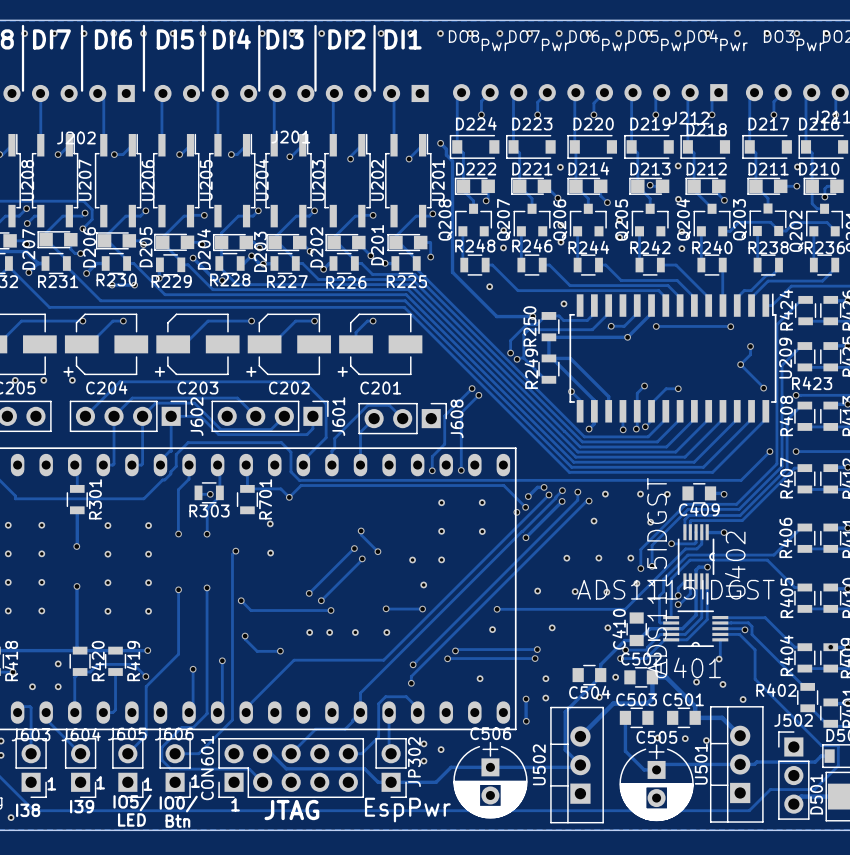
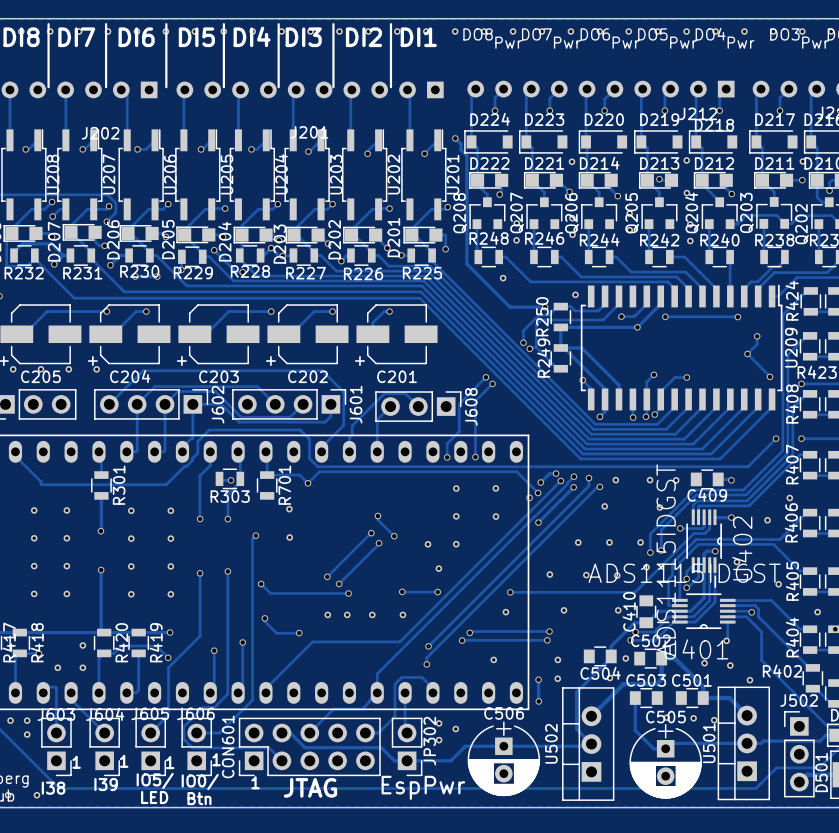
part: none -> (789, 498)
part: none -> (767, 520)
part: none -> (736, 562)
part: none -> (778, 584)
part: none -> (817, 612)

